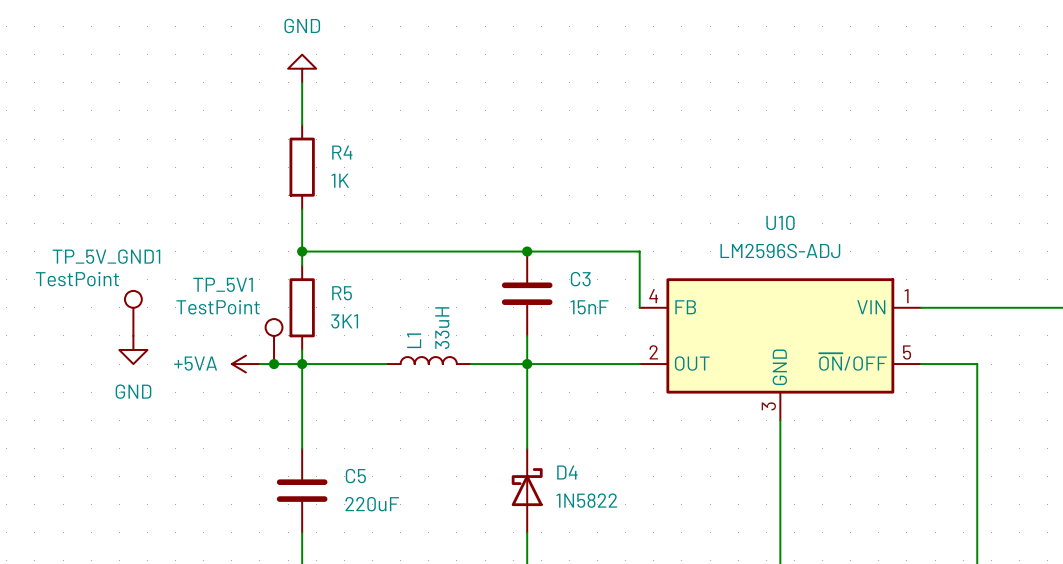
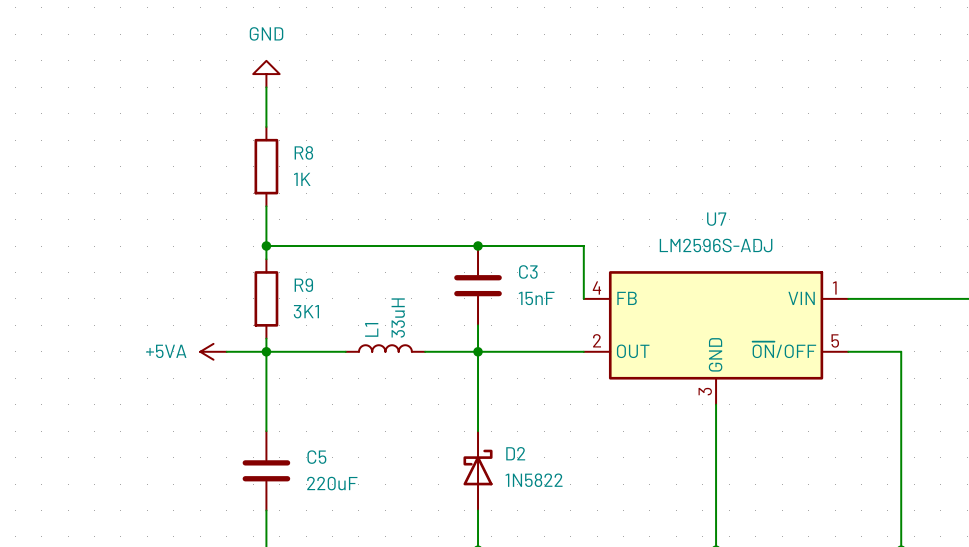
R4 name: R4 (342, 152) -> R8 (303, 152)
U10 name: U10 (780, 222) -> U7 (716, 219)
R5 name: R5 (342, 293) -> R9 (303, 285)
TP_5V_GND1: TestPoint (133, 313) -> none
TP_5V1: TestPoint (274, 341) -> none
power symbol: GND (133, 349) -> none
junction: (274, 364) -> none
D4 name: D4 (567, 472) -> D2 (515, 453)

